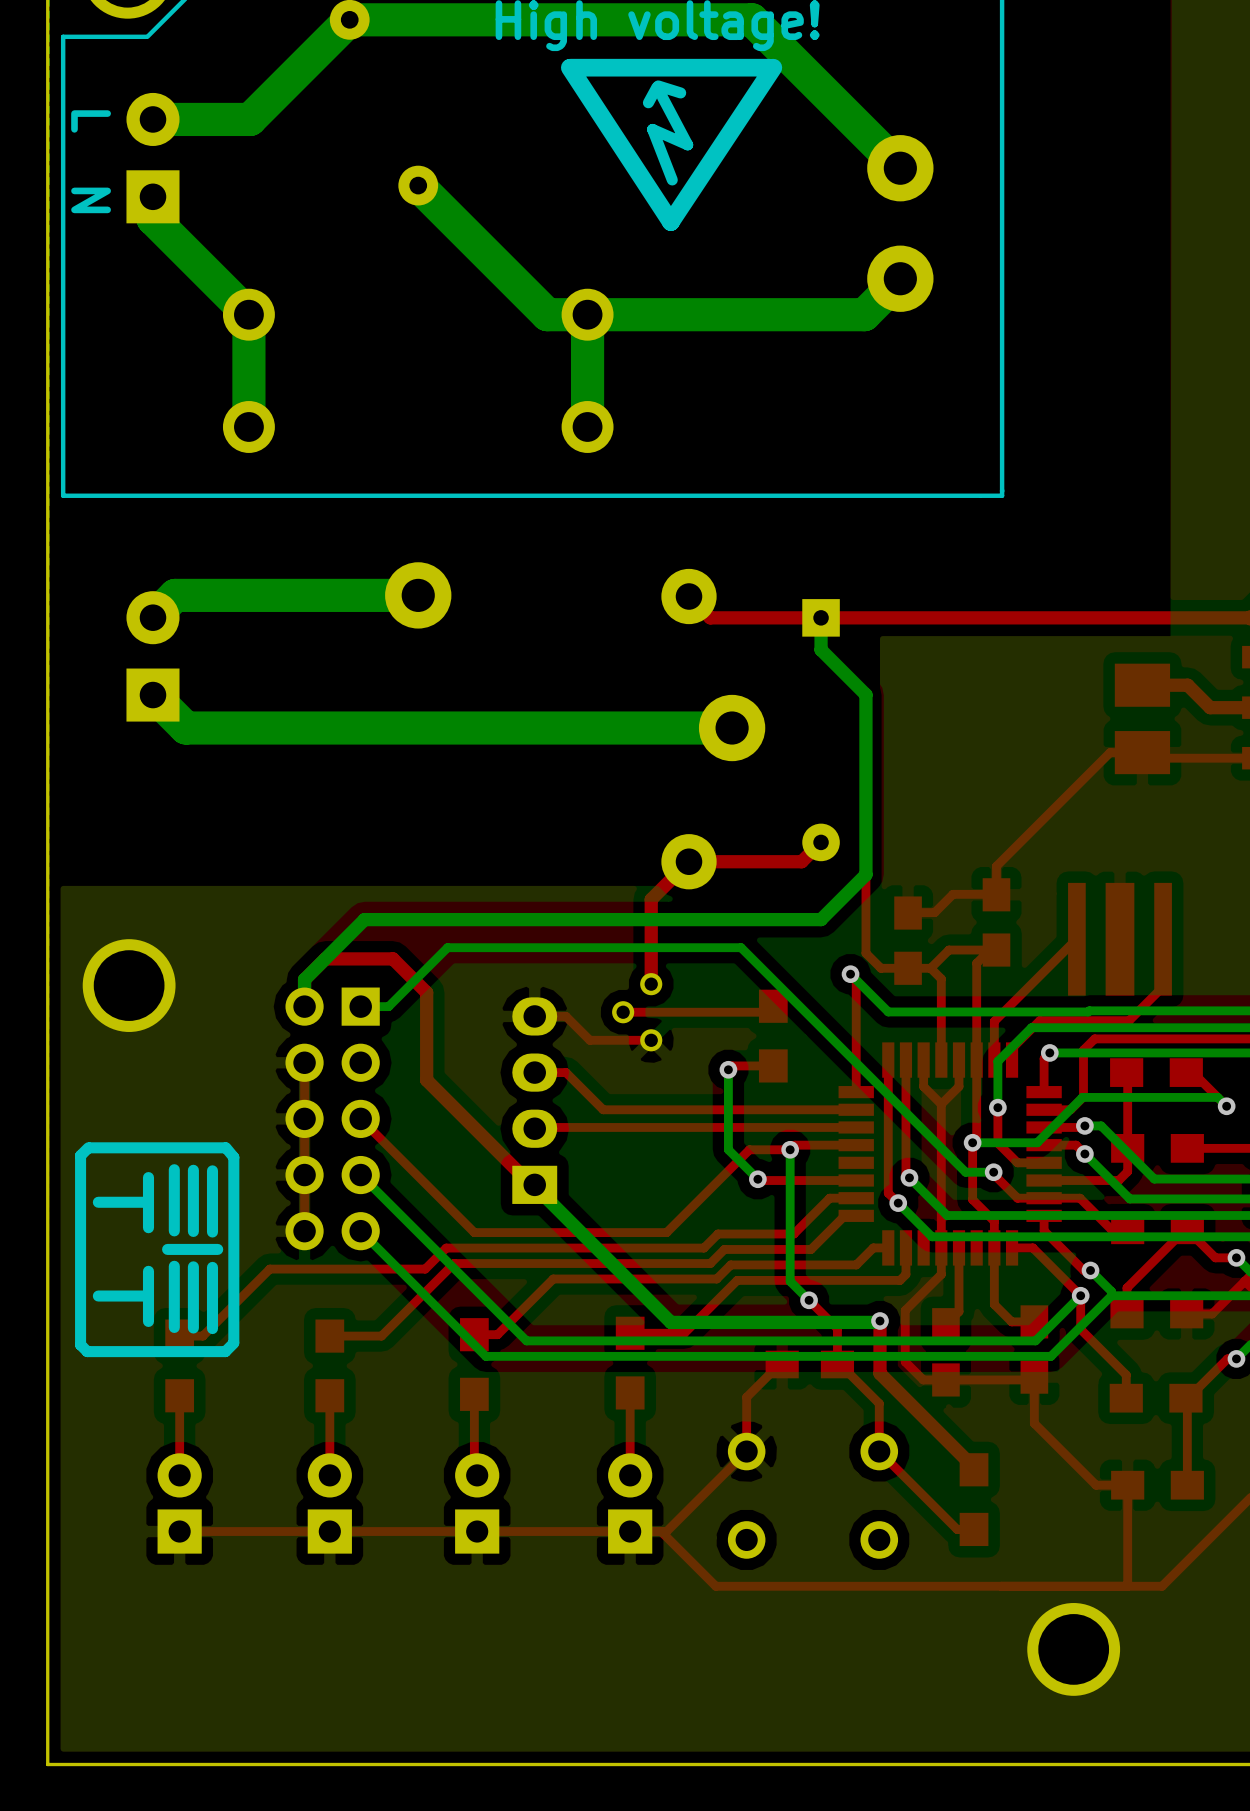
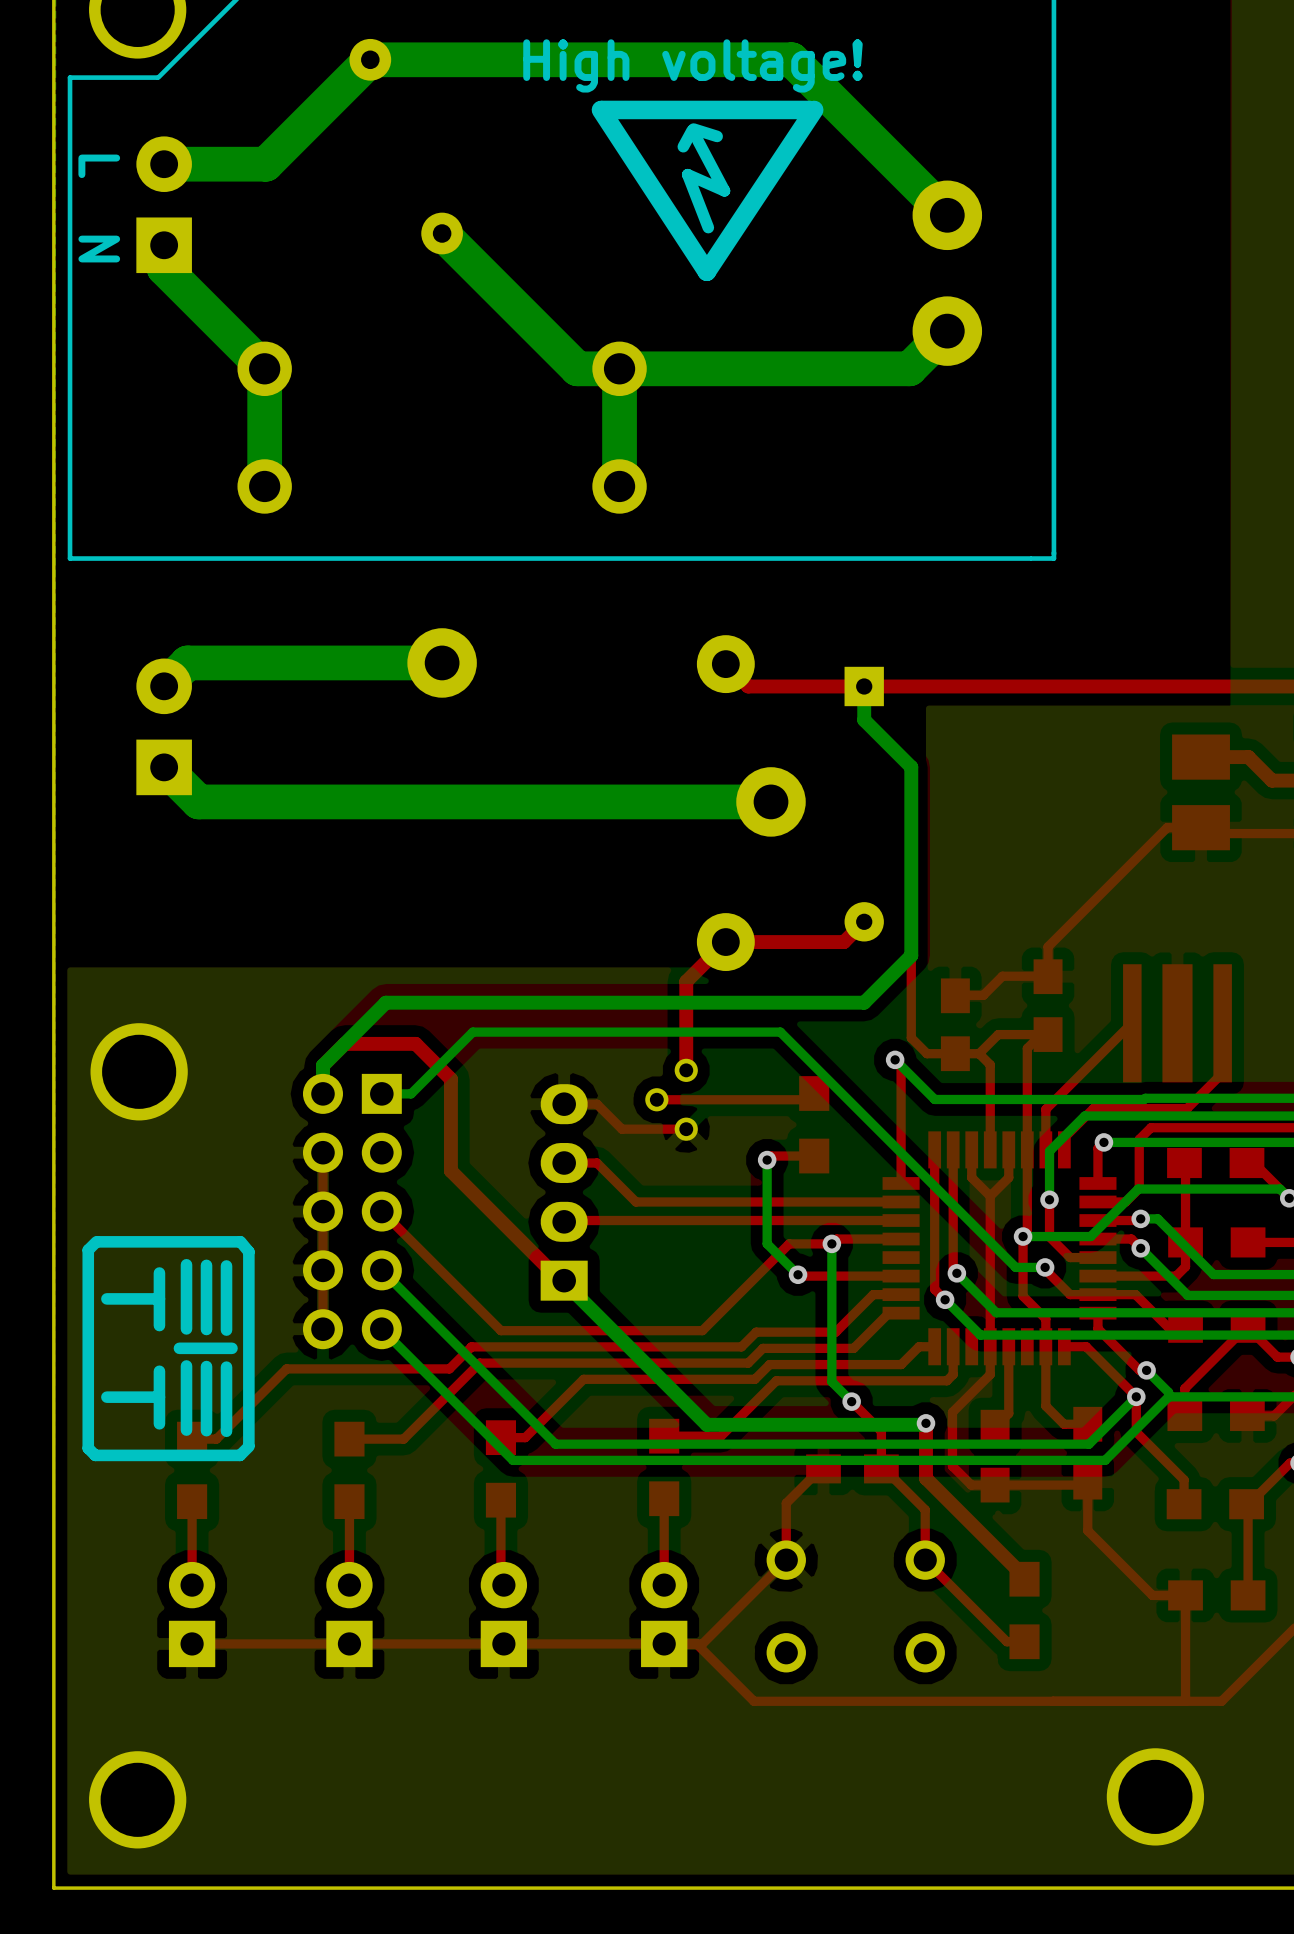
part position: (1073, 1649) -> (1155, 1796)
part: none -> (137, 1799)

